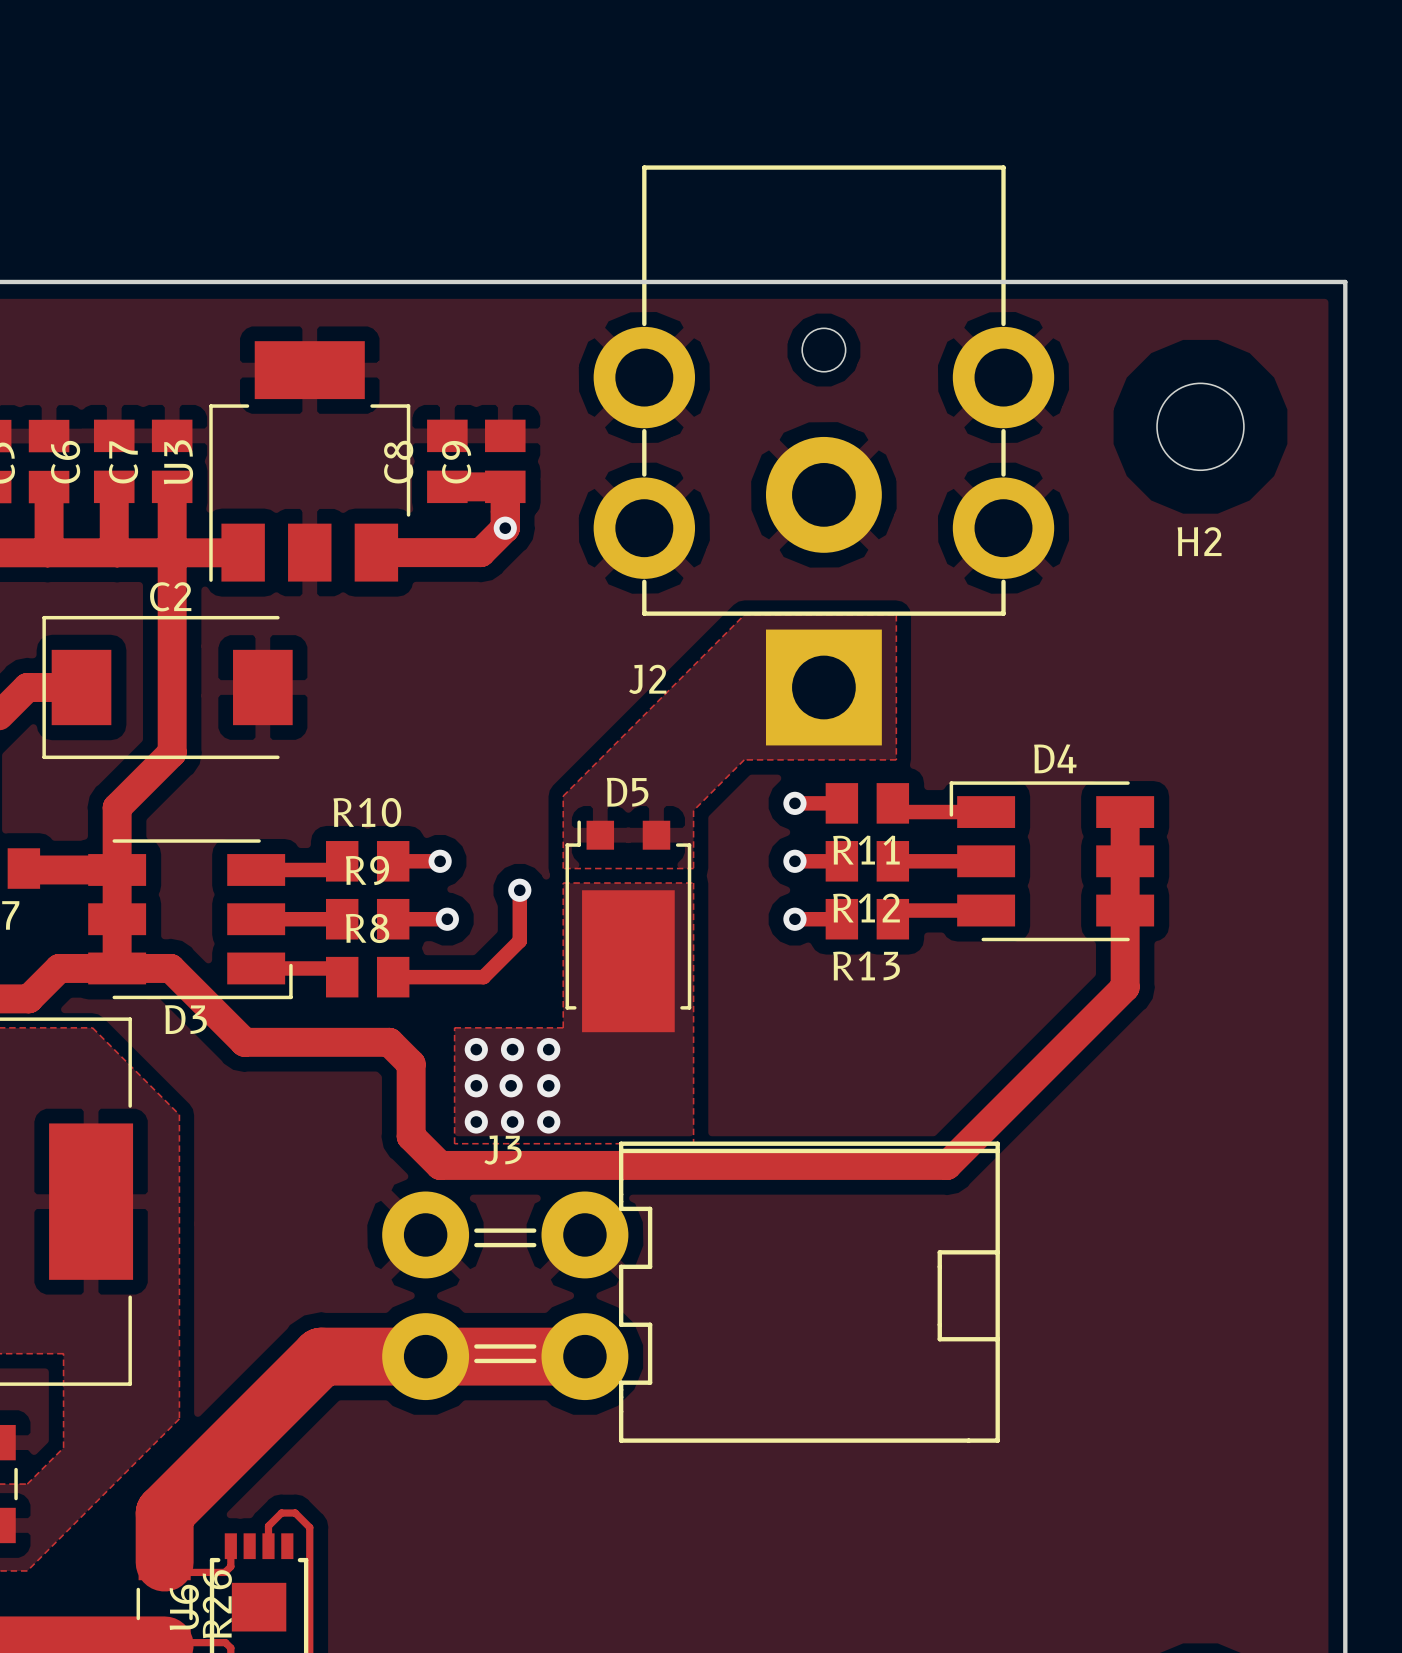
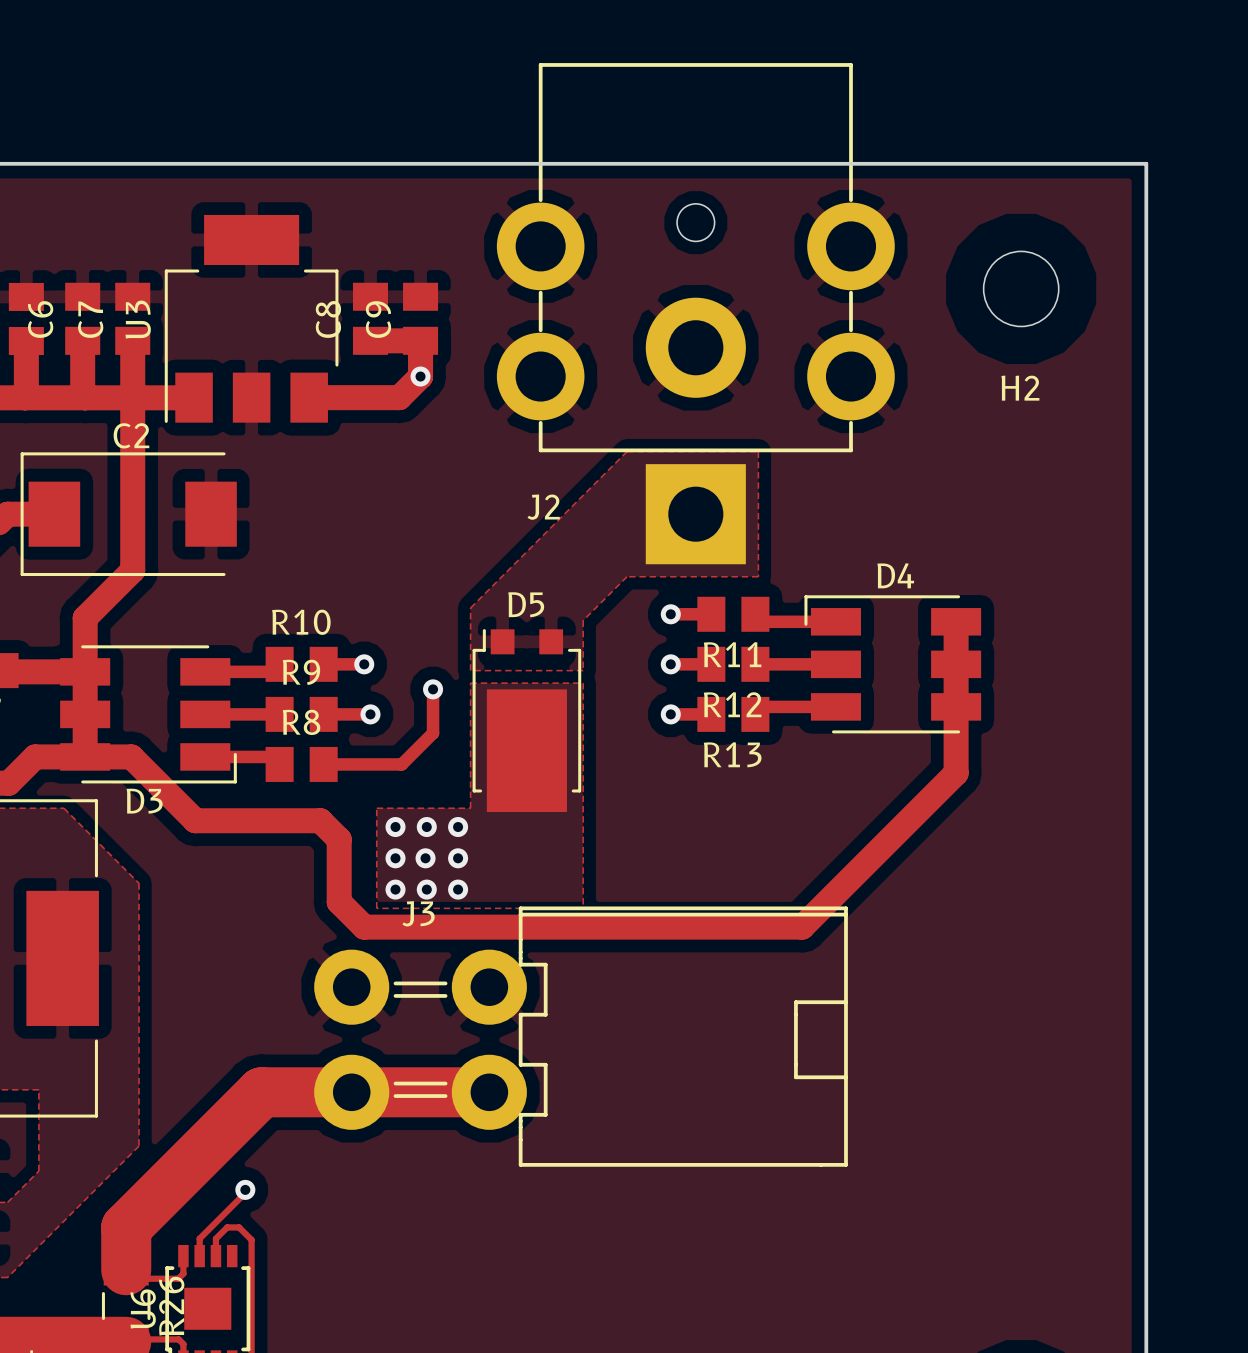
track: none -> (245, 1189) (245, 1193) (199, 1238) (199, 1256)
via: none -> (245, 1189)

